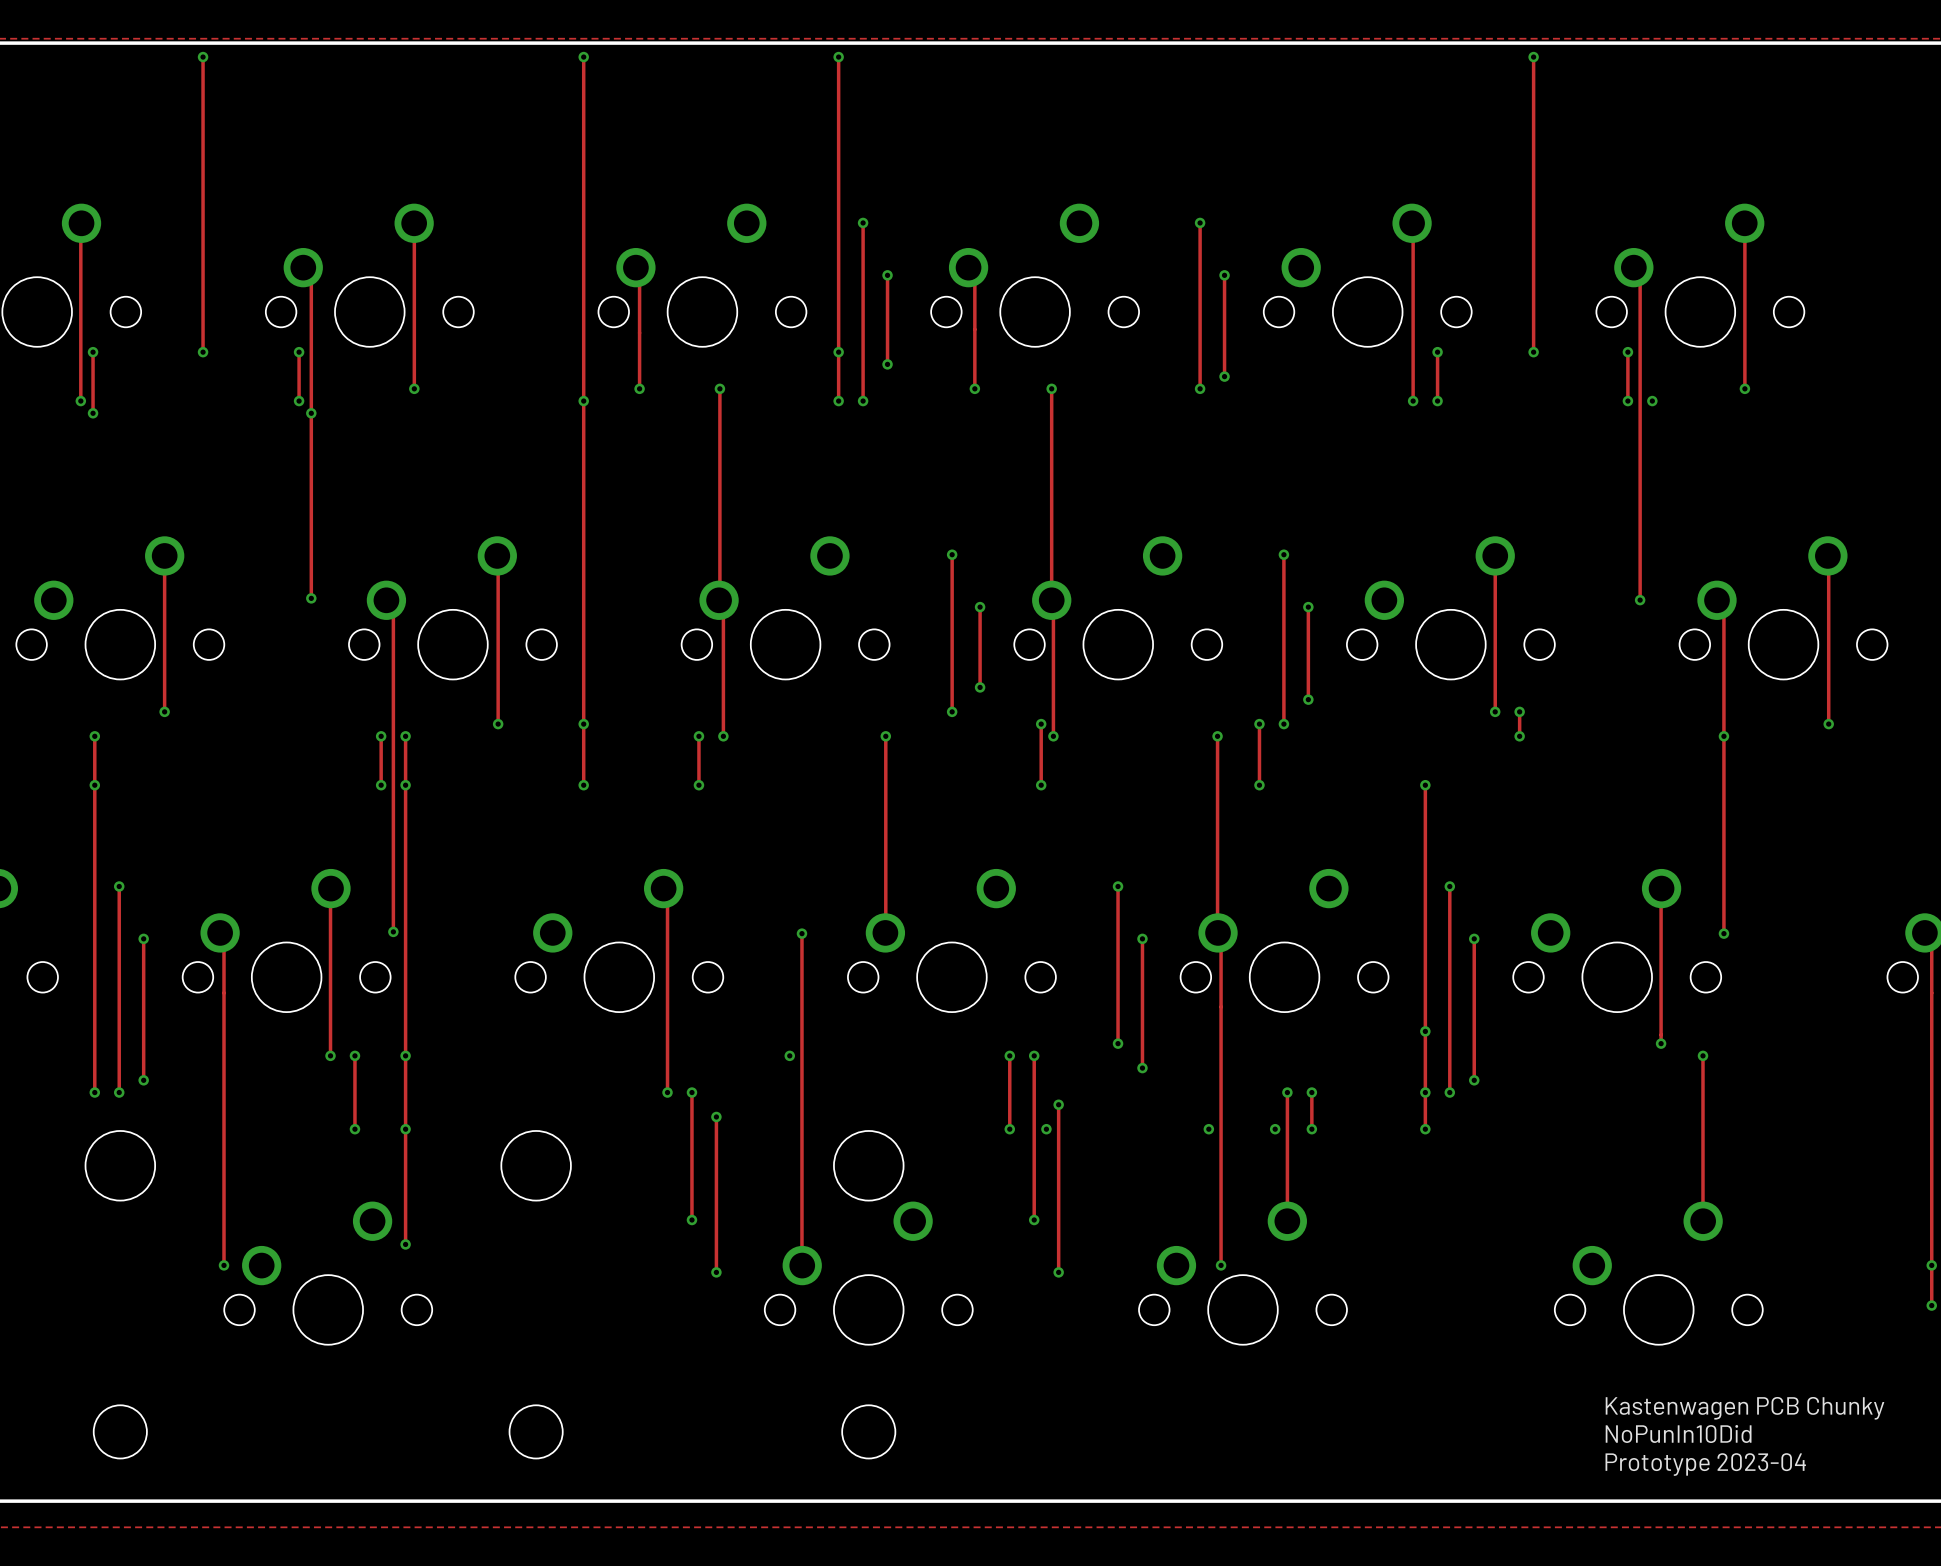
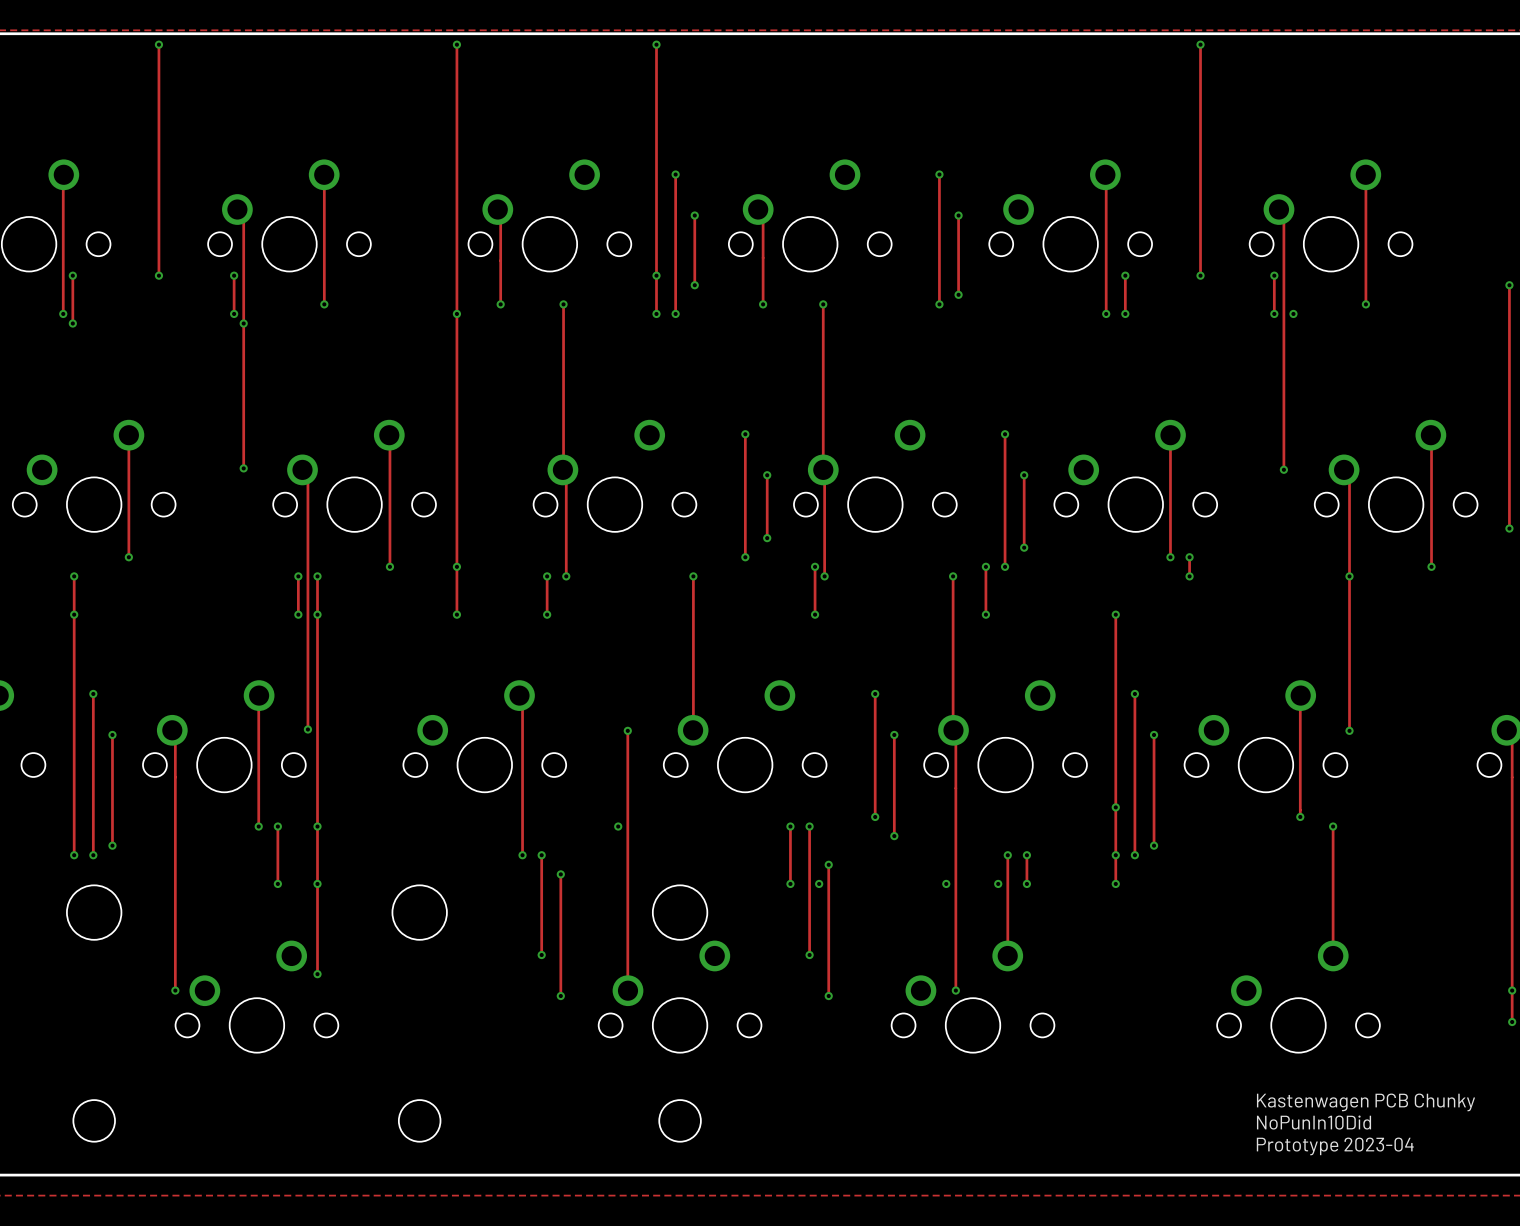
track: none -> (1509, 285) (1509, 528)
via: none -> (1509, 285)
via: none -> (1509, 528)

